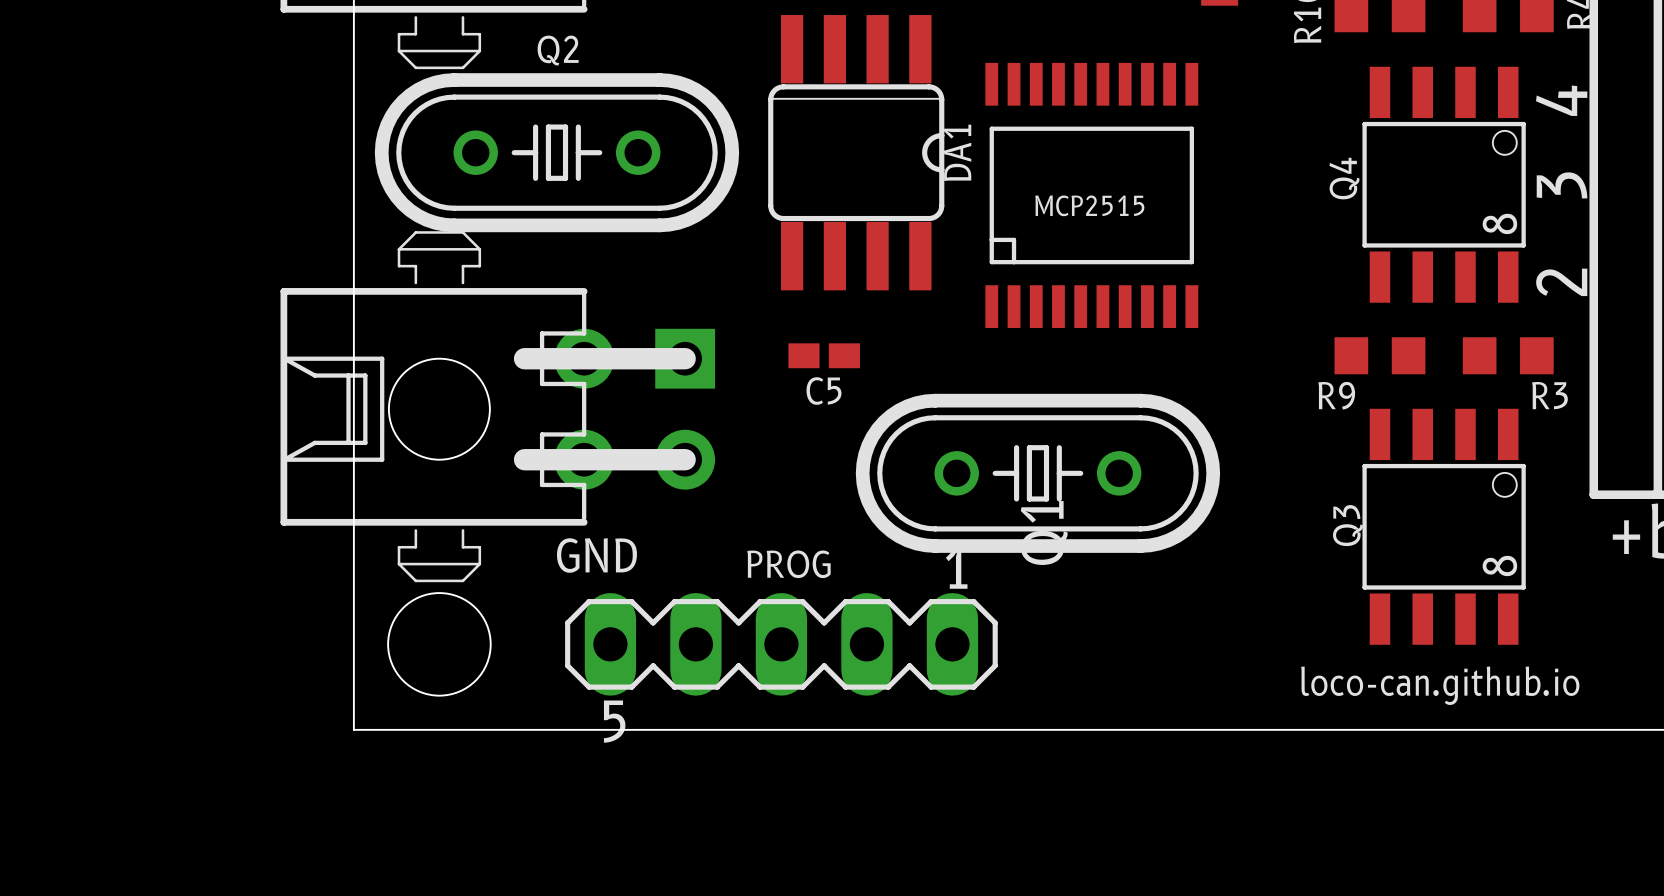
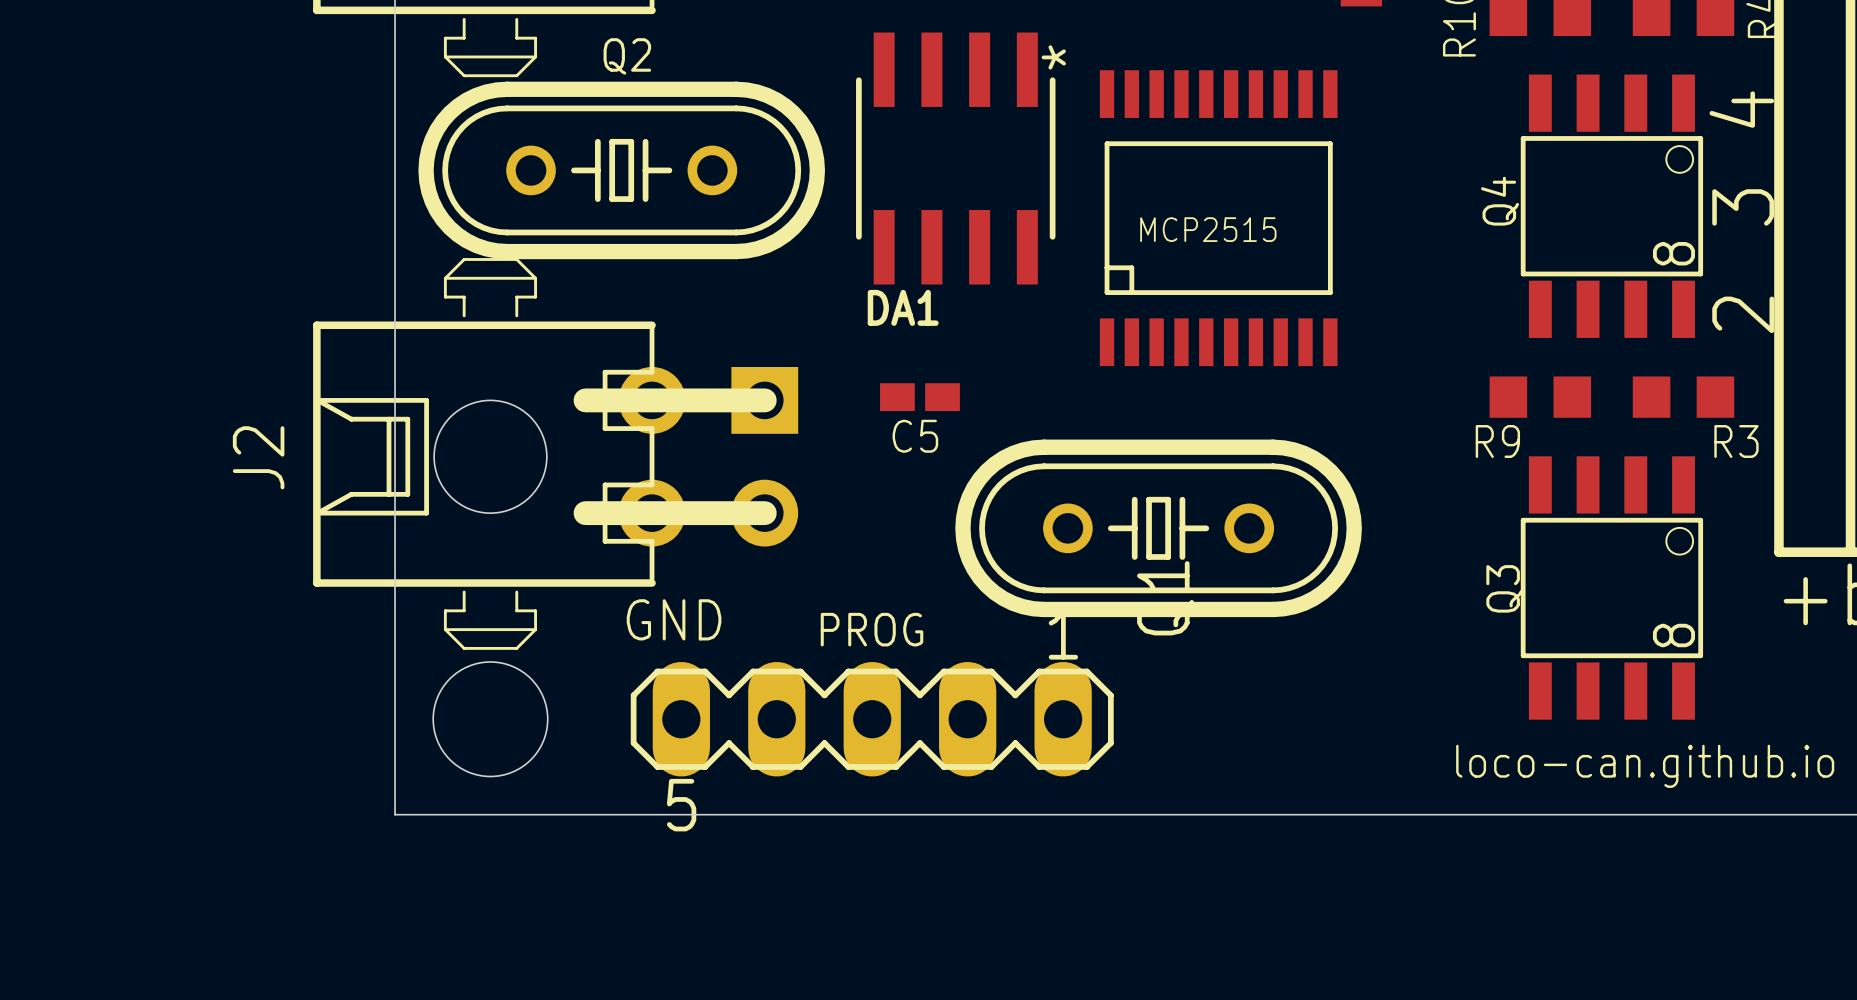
DA1 footprint: [768, 15, 945, 291] -> [856, 32, 1056, 285]
DA1 name position: DA1 (957, 152) -> DA1 (903, 307)
J2 name: none -> J2 (258, 457)

